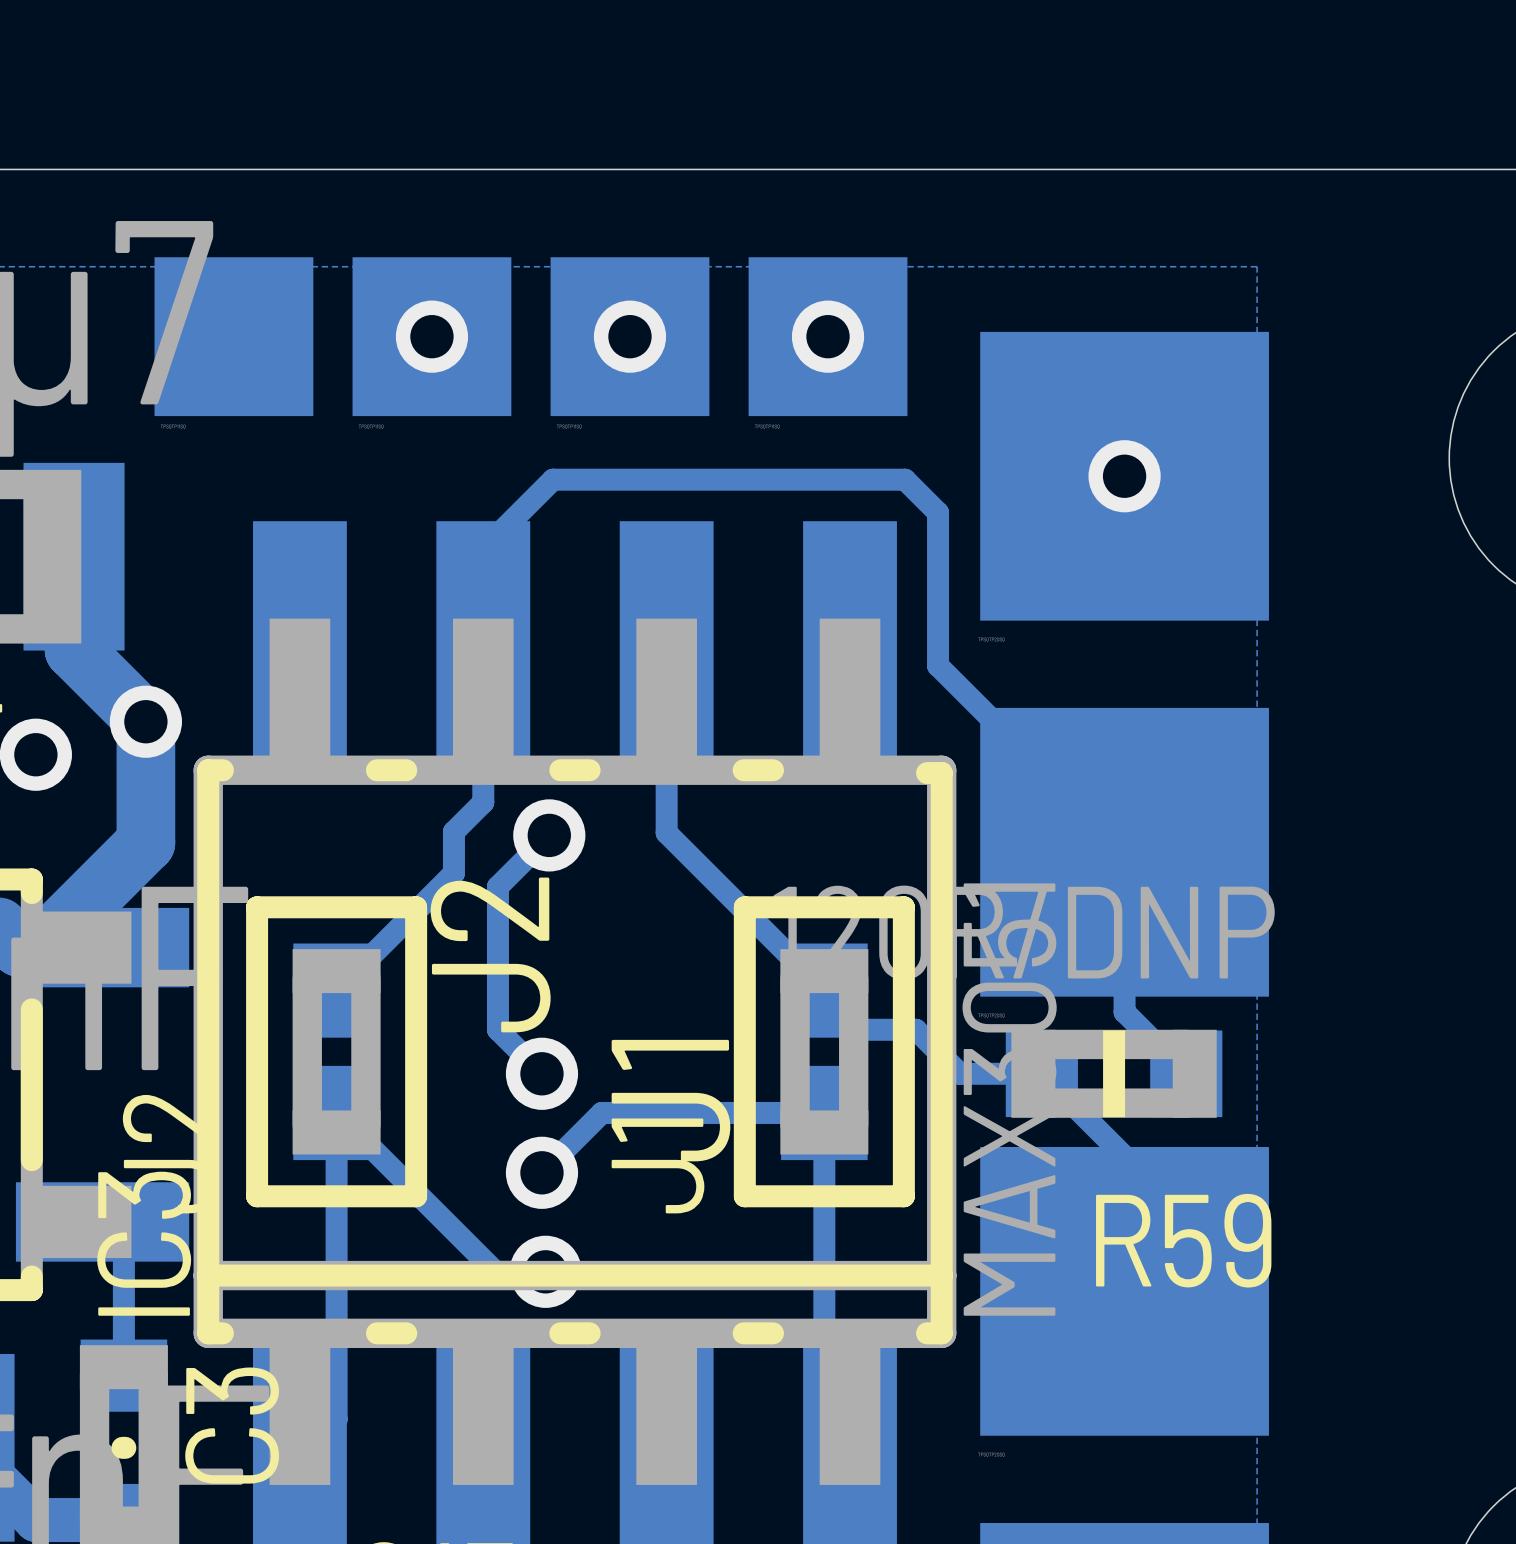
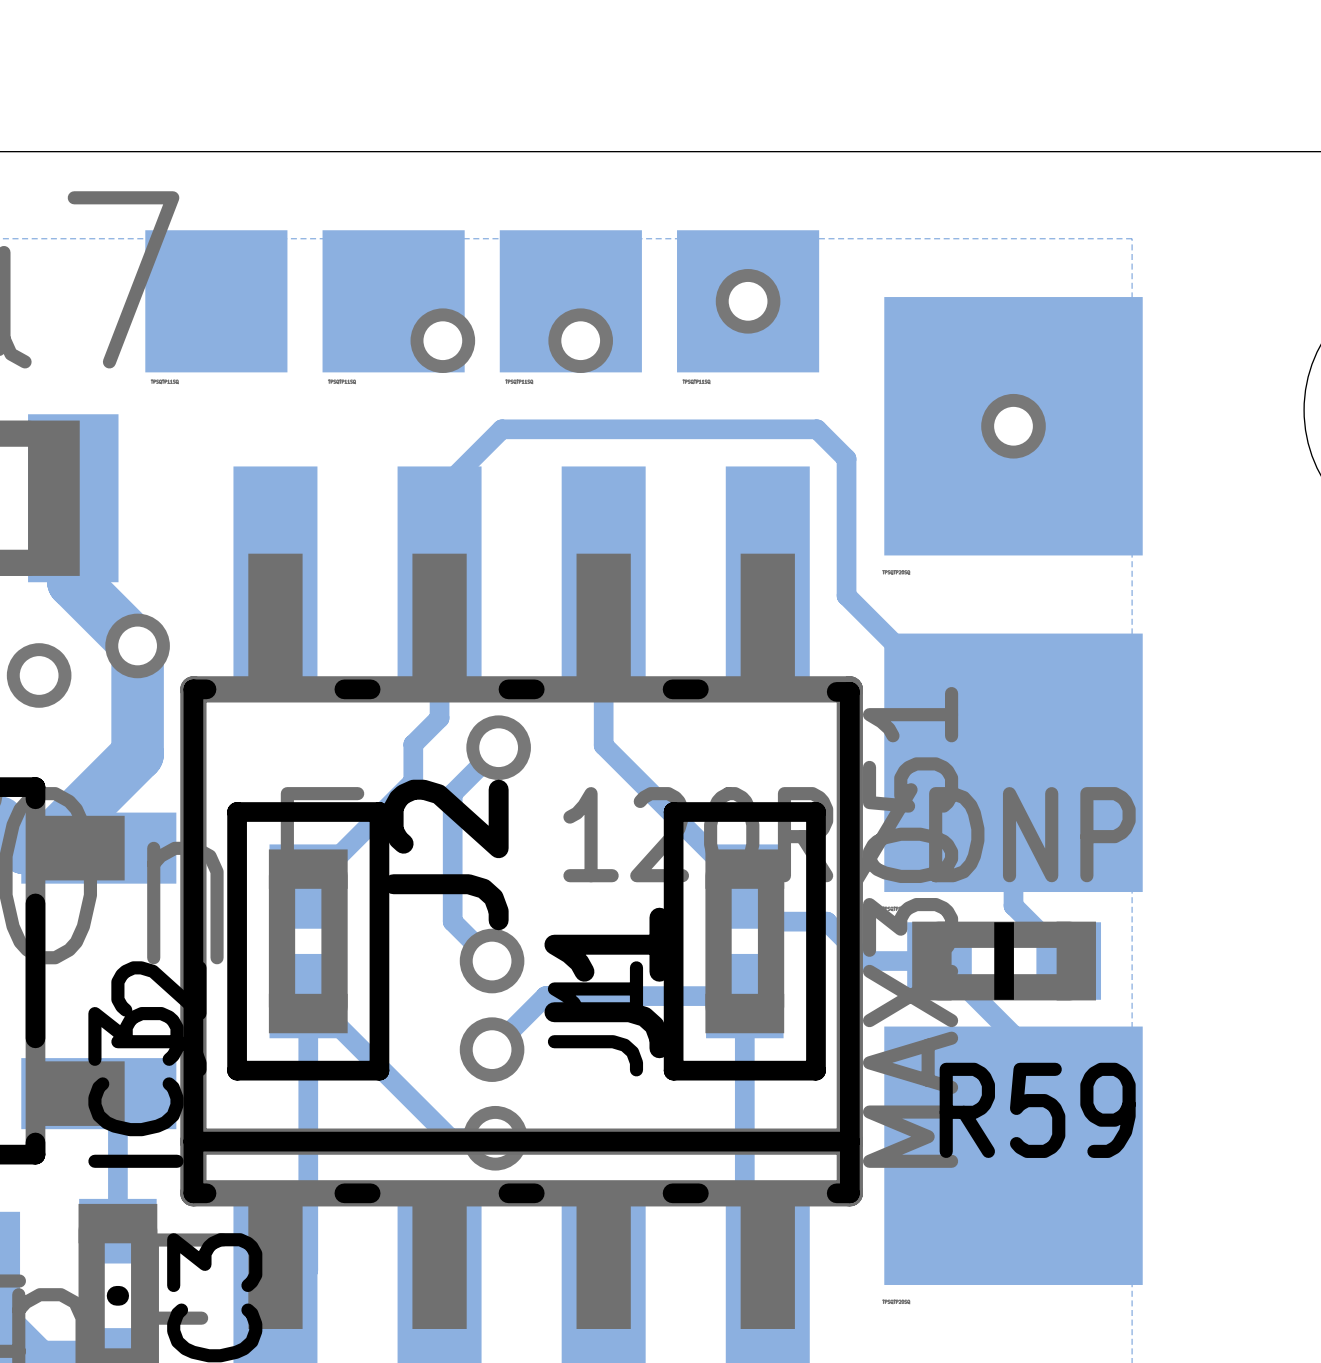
via position: (431, 336) -> (442, 340)
via position: (629, 336) -> (580, 340)

